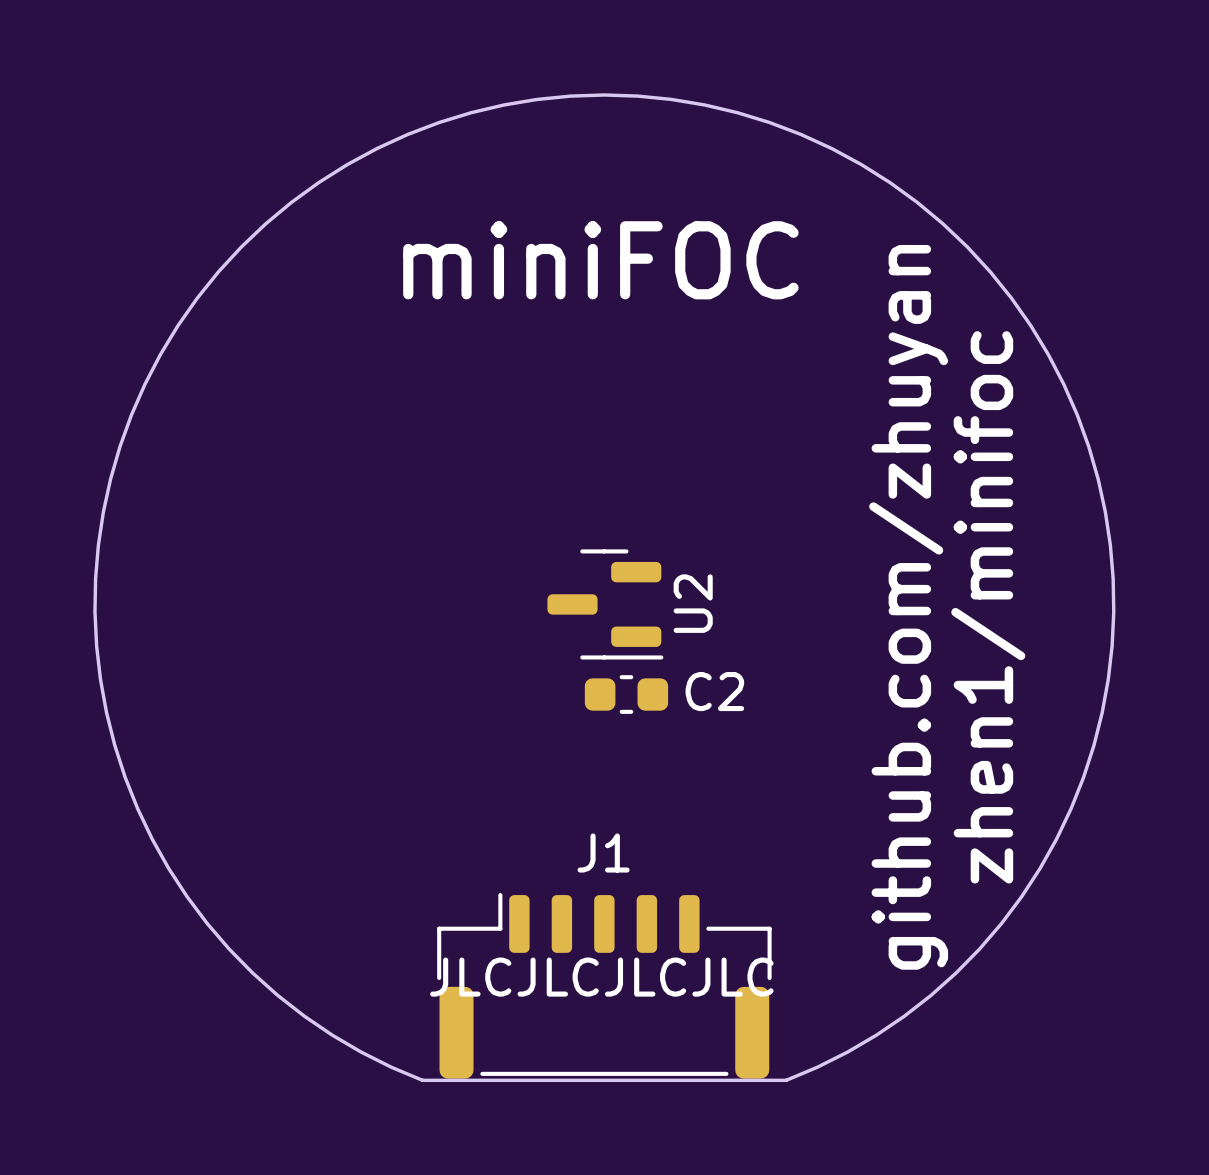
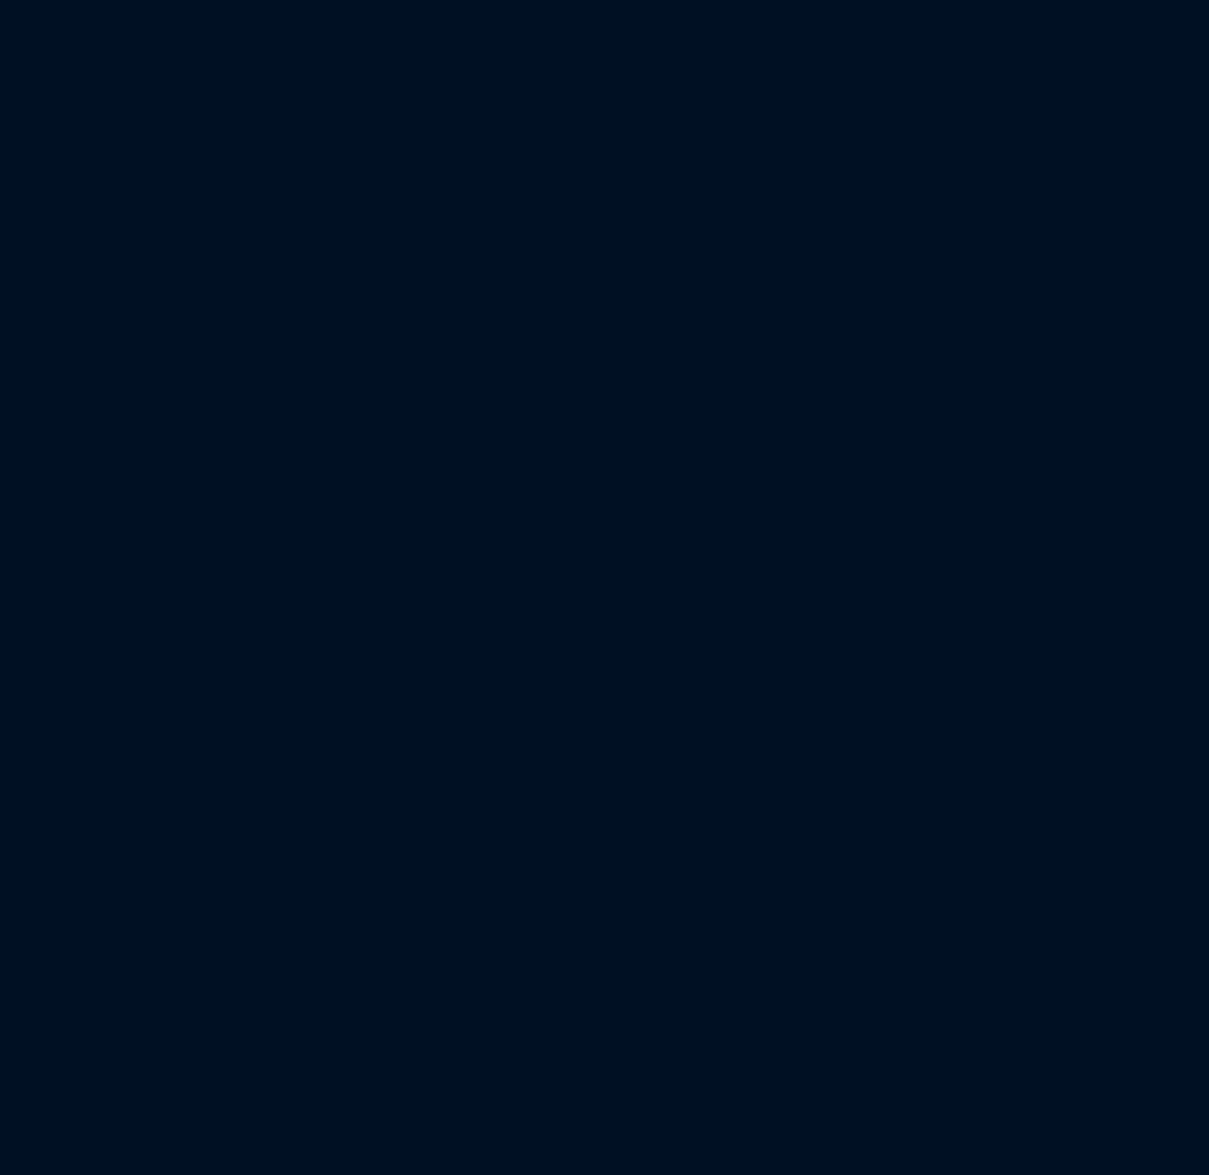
text: miniFOC (600, 260) -> none
U2: (605, 604) -> none
text: github.com/zhuyan (908, 607) -> none
text: zhen1/minifoc (988, 607) -> none
C2: (626, 694) -> none
text: JLCJLCJLCJLC (601, 977) -> none
J1: (604, 985) -> none
board edge: (422, 1080) (786, 1080) (817, 1067) (876, 1035) (930, 995) (955, 973) (979, 949) (1021, 896) (1056, 839) (1071, 808) (1083, 777) (1102, 712) (1112, 646) (1113, 612) (1110, 545) (1105, 511) (1098, 479) (1077, 415) (1048, 354) (1030, 325) (990, 271) (967, 247) (943, 223) (889, 182) (861, 164) (801, 134) (769, 122) (704, 104) (638, 96) (604, 94) (570, 96) (504, 104) (471, 112) (407, 134) (376, 148) (318, 182) (265, 223) (241, 247) (197, 298) (178, 325) (160, 354) (131, 415) (110, 479) (103, 511) (98, 545) (94, 612) (100, 679) (106, 712) (125, 777) (137, 808) (168, 868) (187, 896) (229, 949) (252, 973) (304, 1016) (332, 1035) (361, 1052) (422, 1080) -> none

